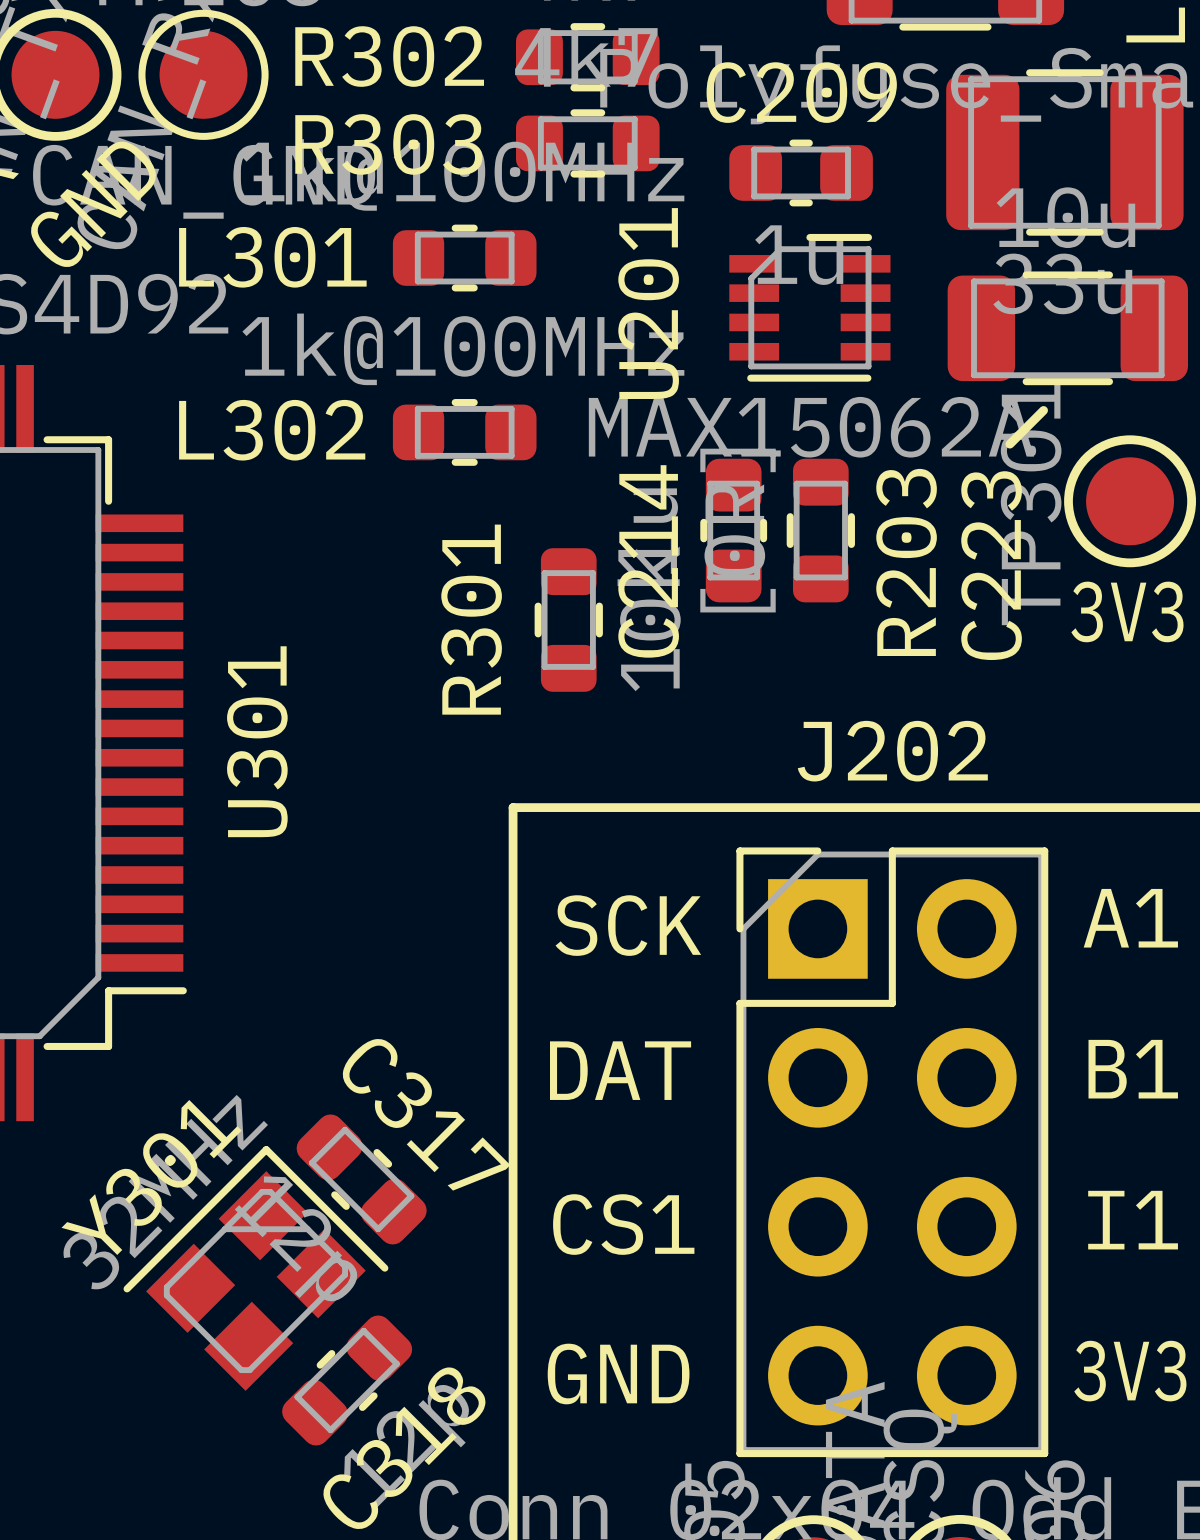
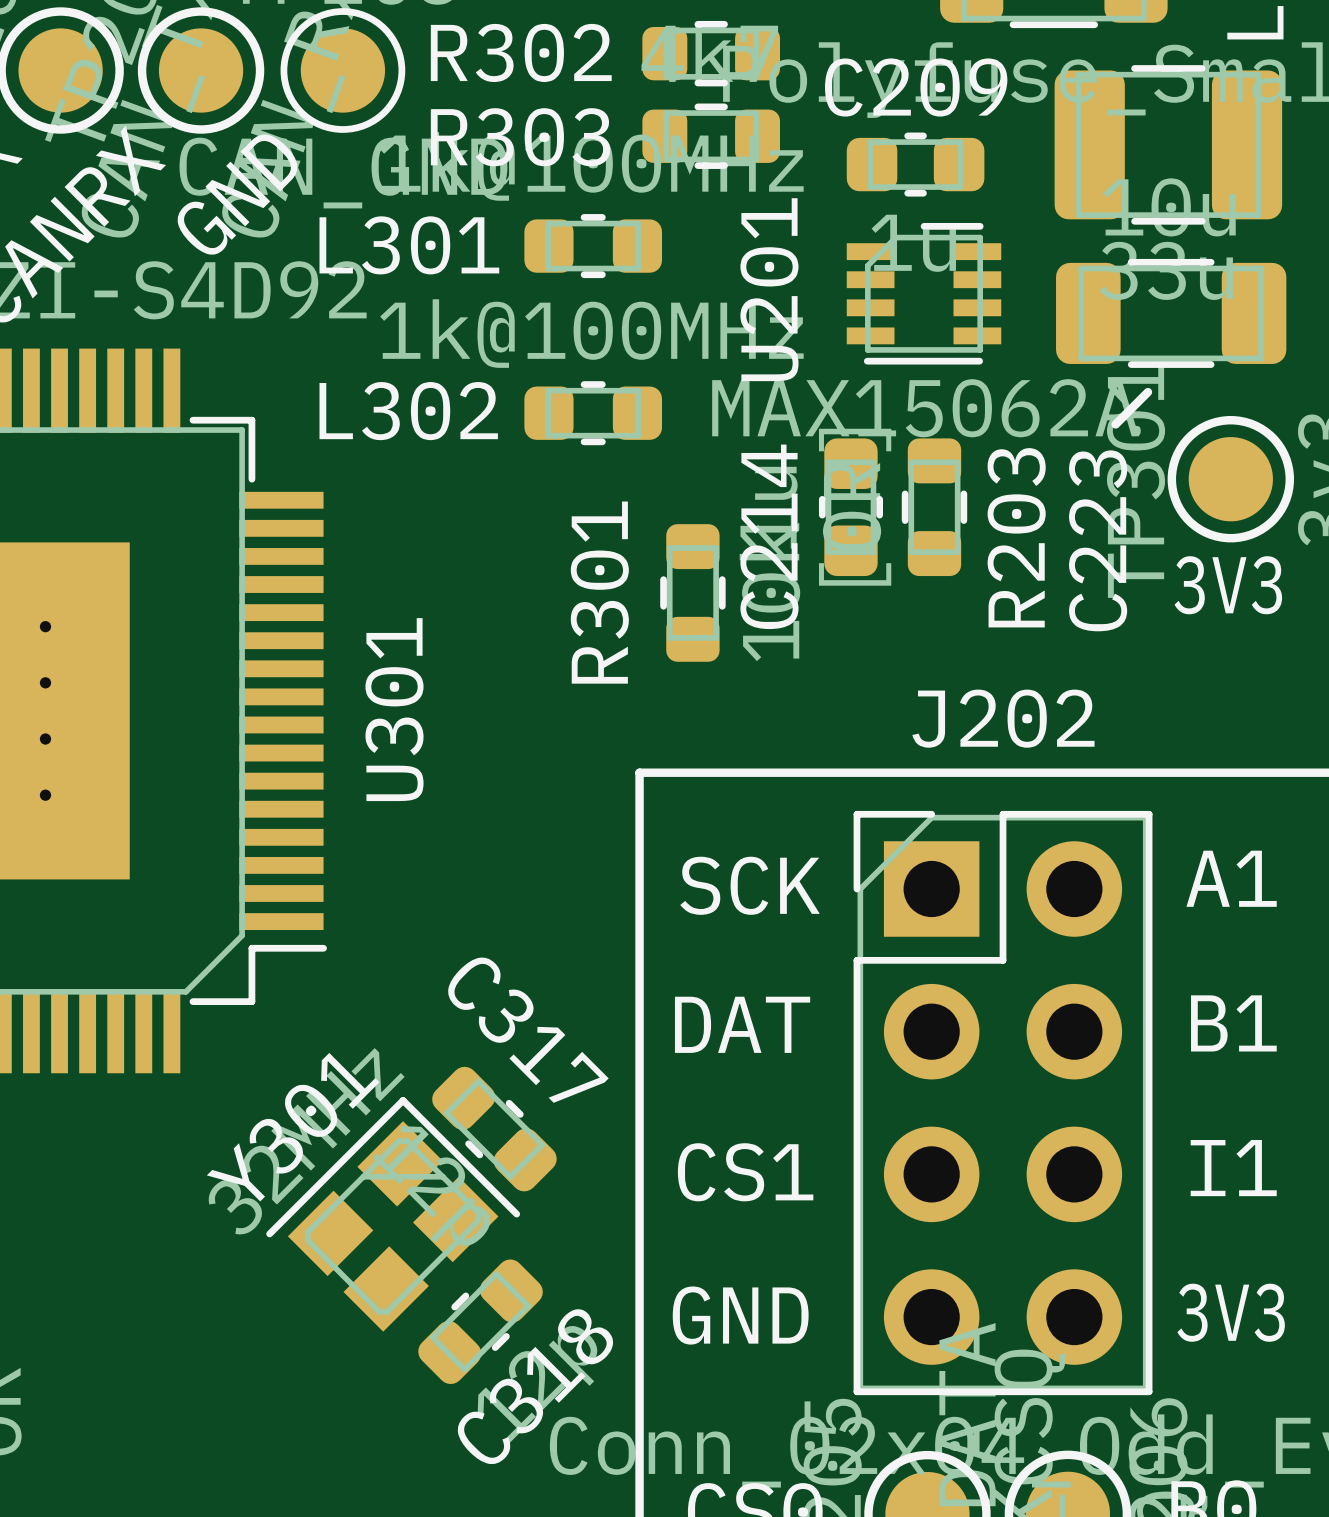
C317 name position: C317 (425, 1114) -> C317 (527, 1029)

